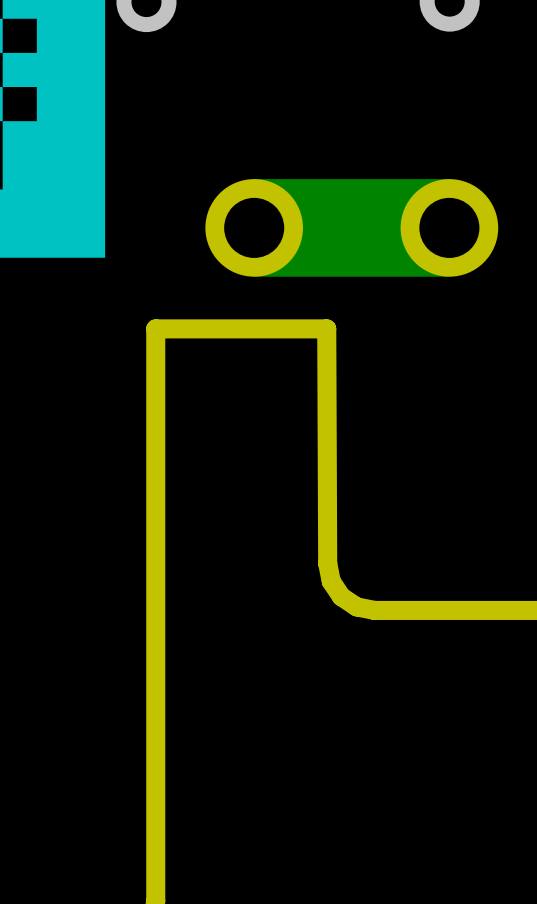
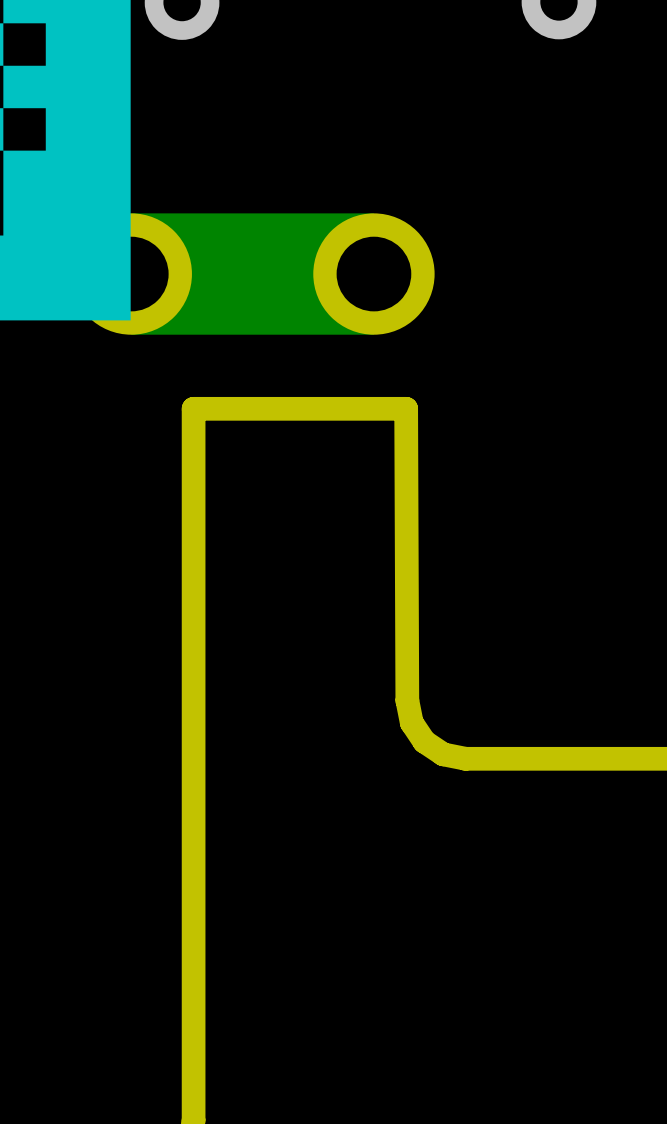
part position: (351, 227) -> (252, 274)

